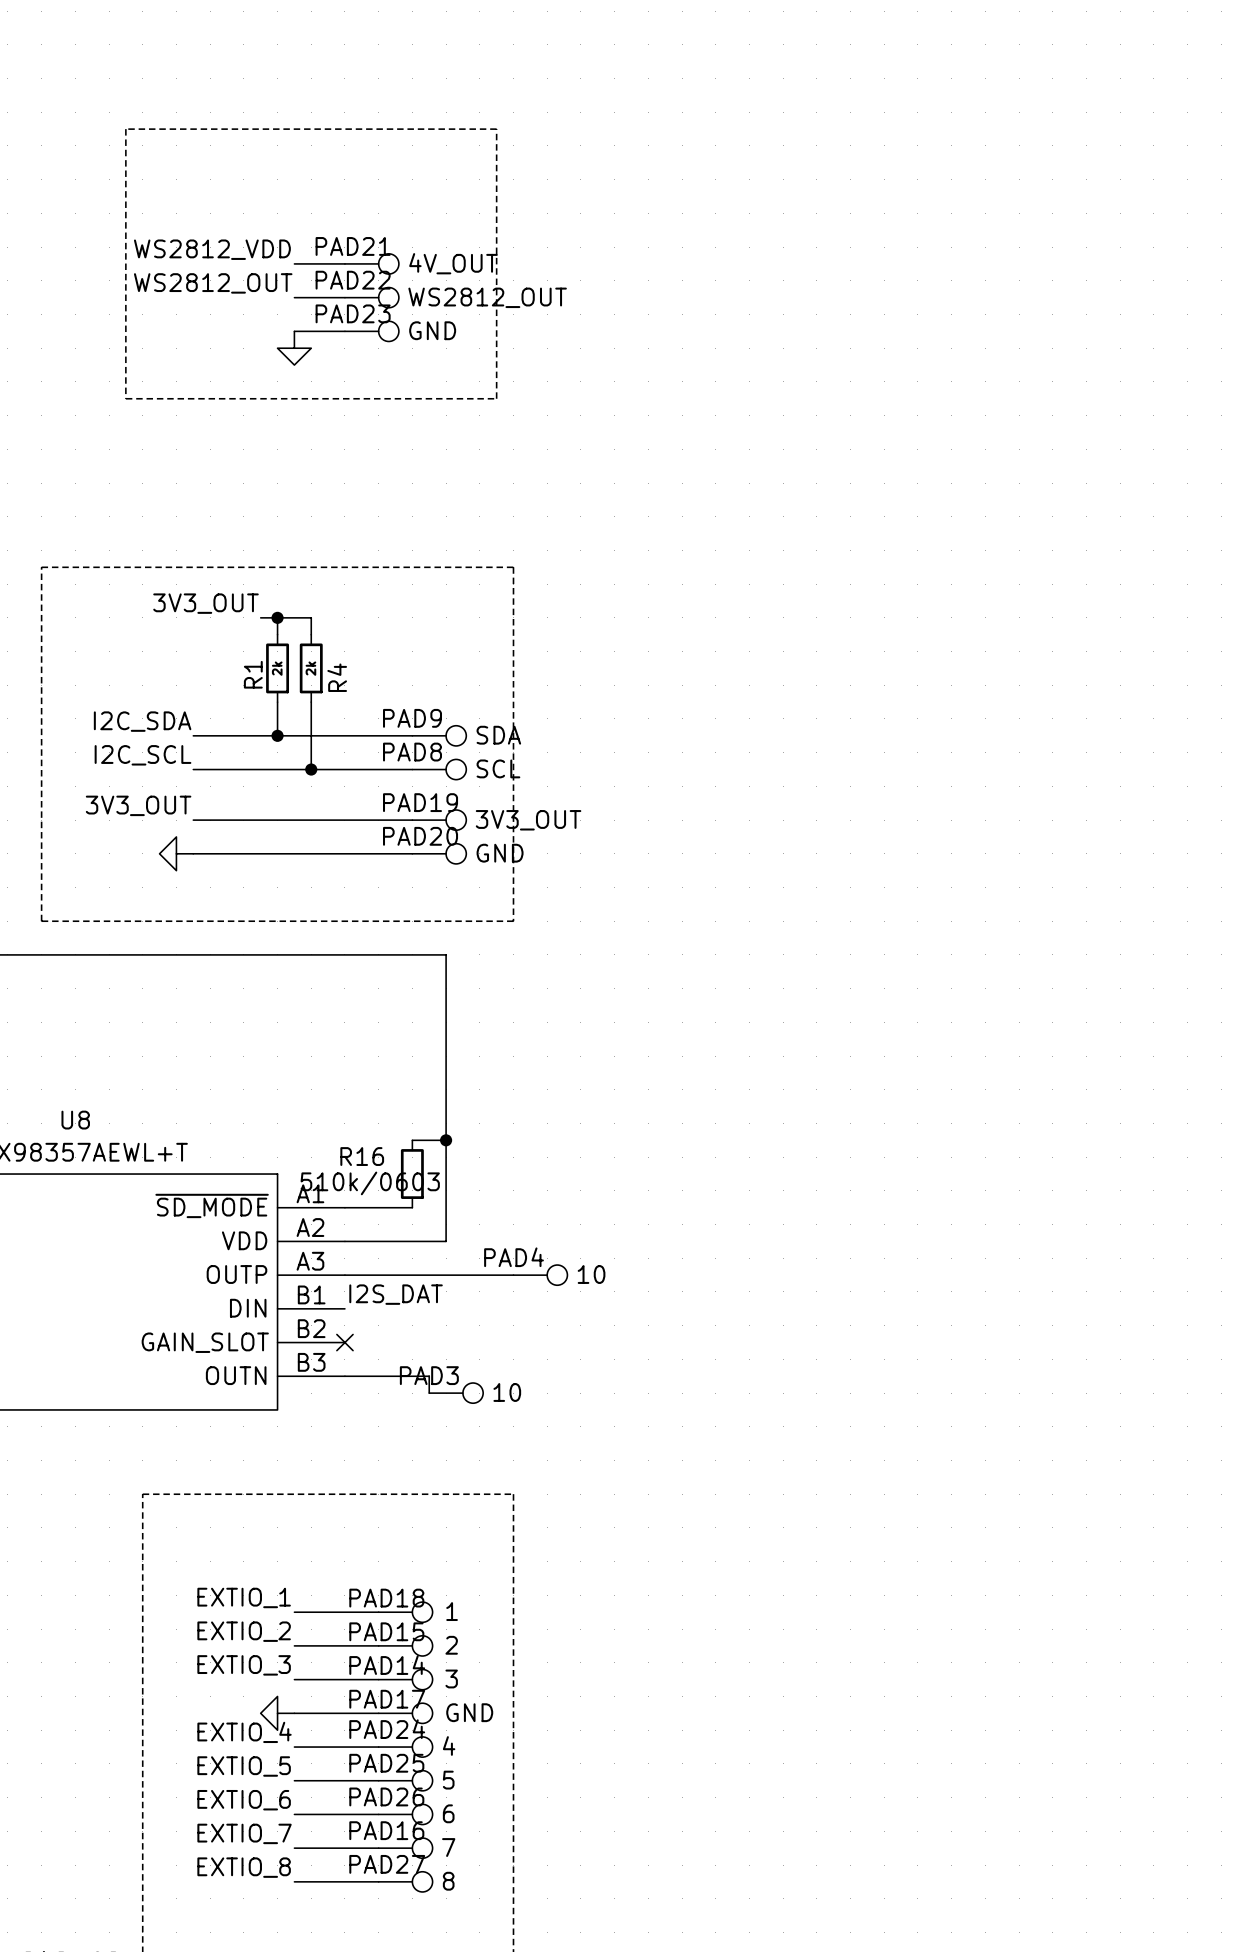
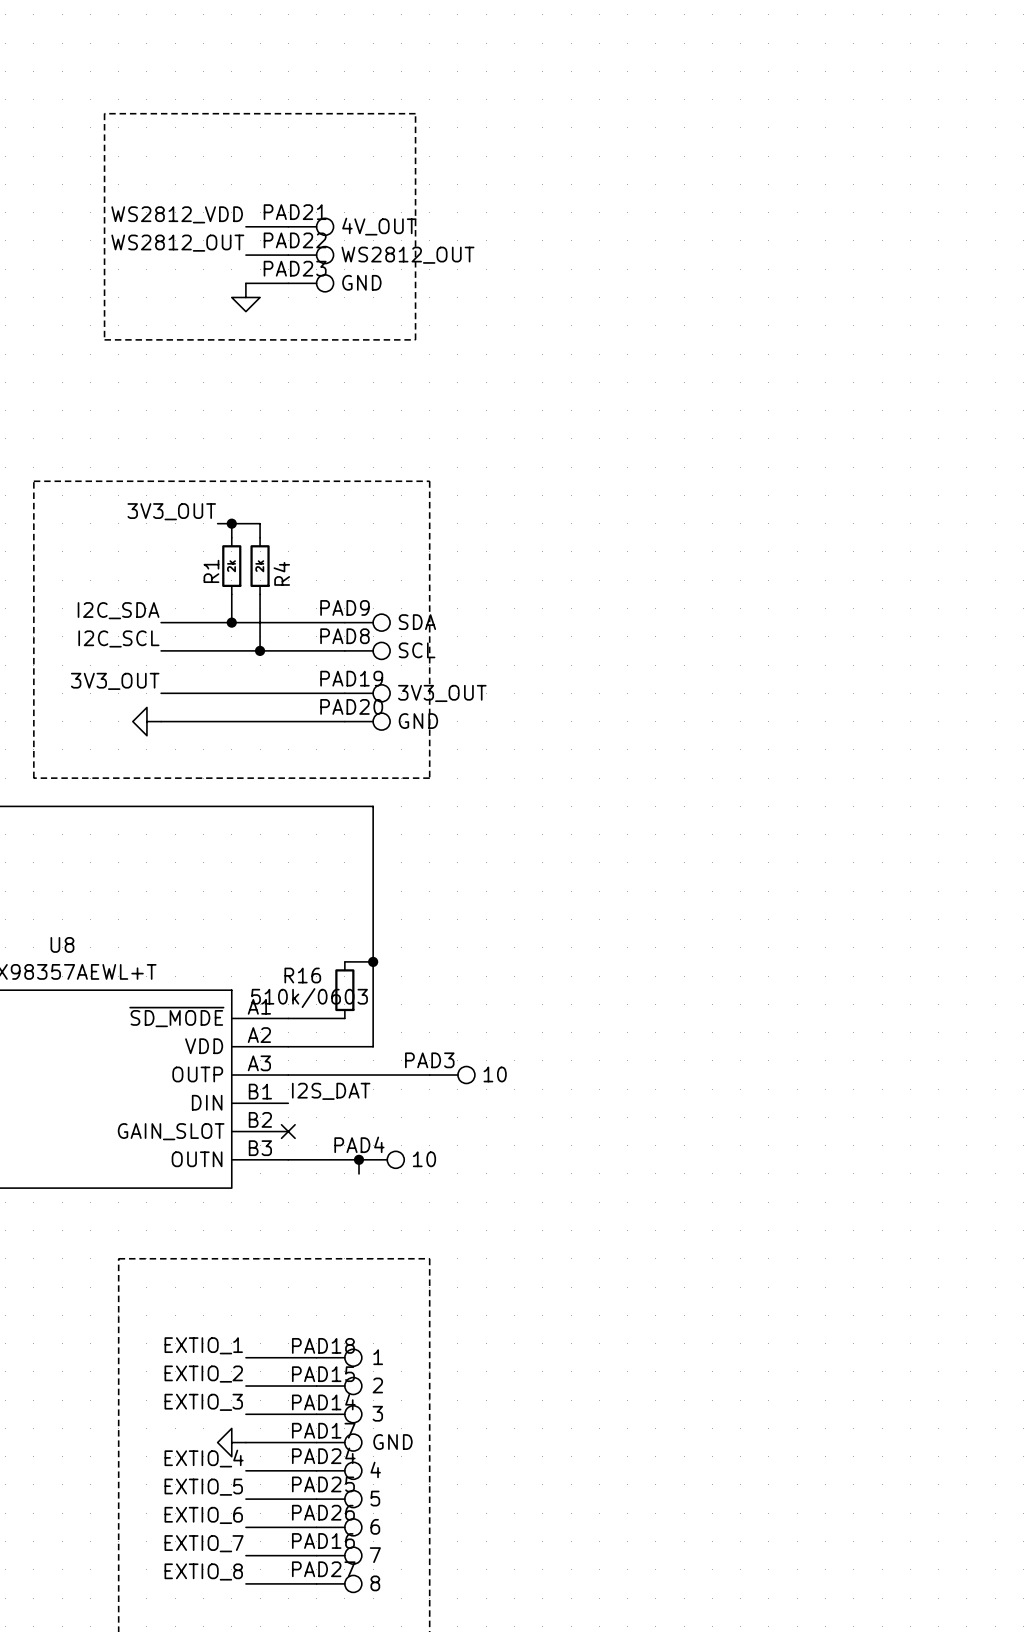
PAD4 name: PAD4 (514, 1257) -> PAD3 (429, 1060)
junction: none -> (359, 1159)
PAD4: none -> 10 (381, 1159)
PAD3: 10 (456, 1393) -> none

